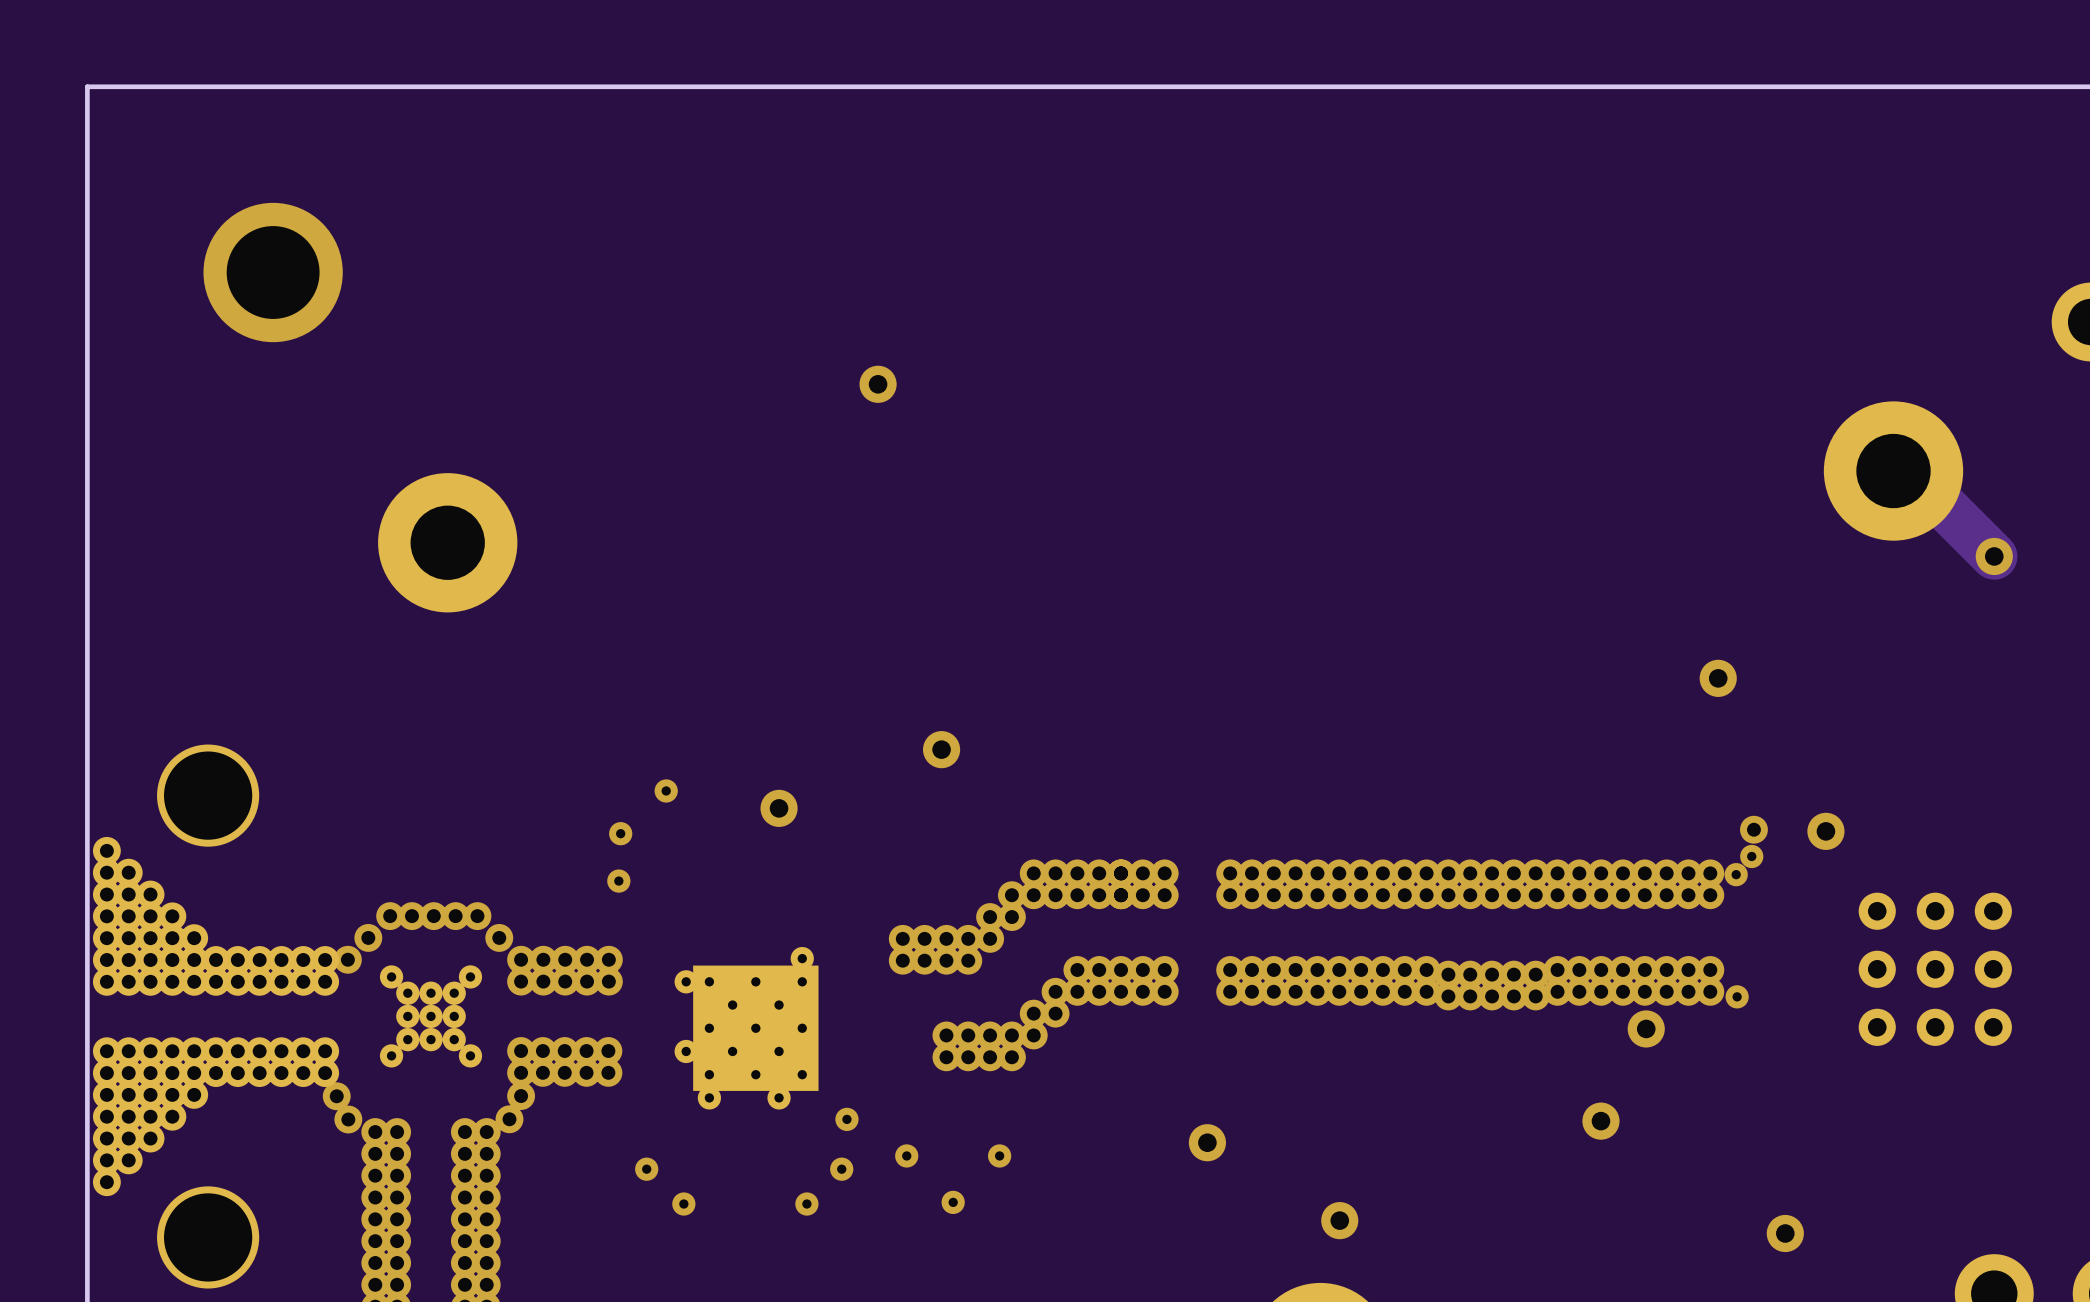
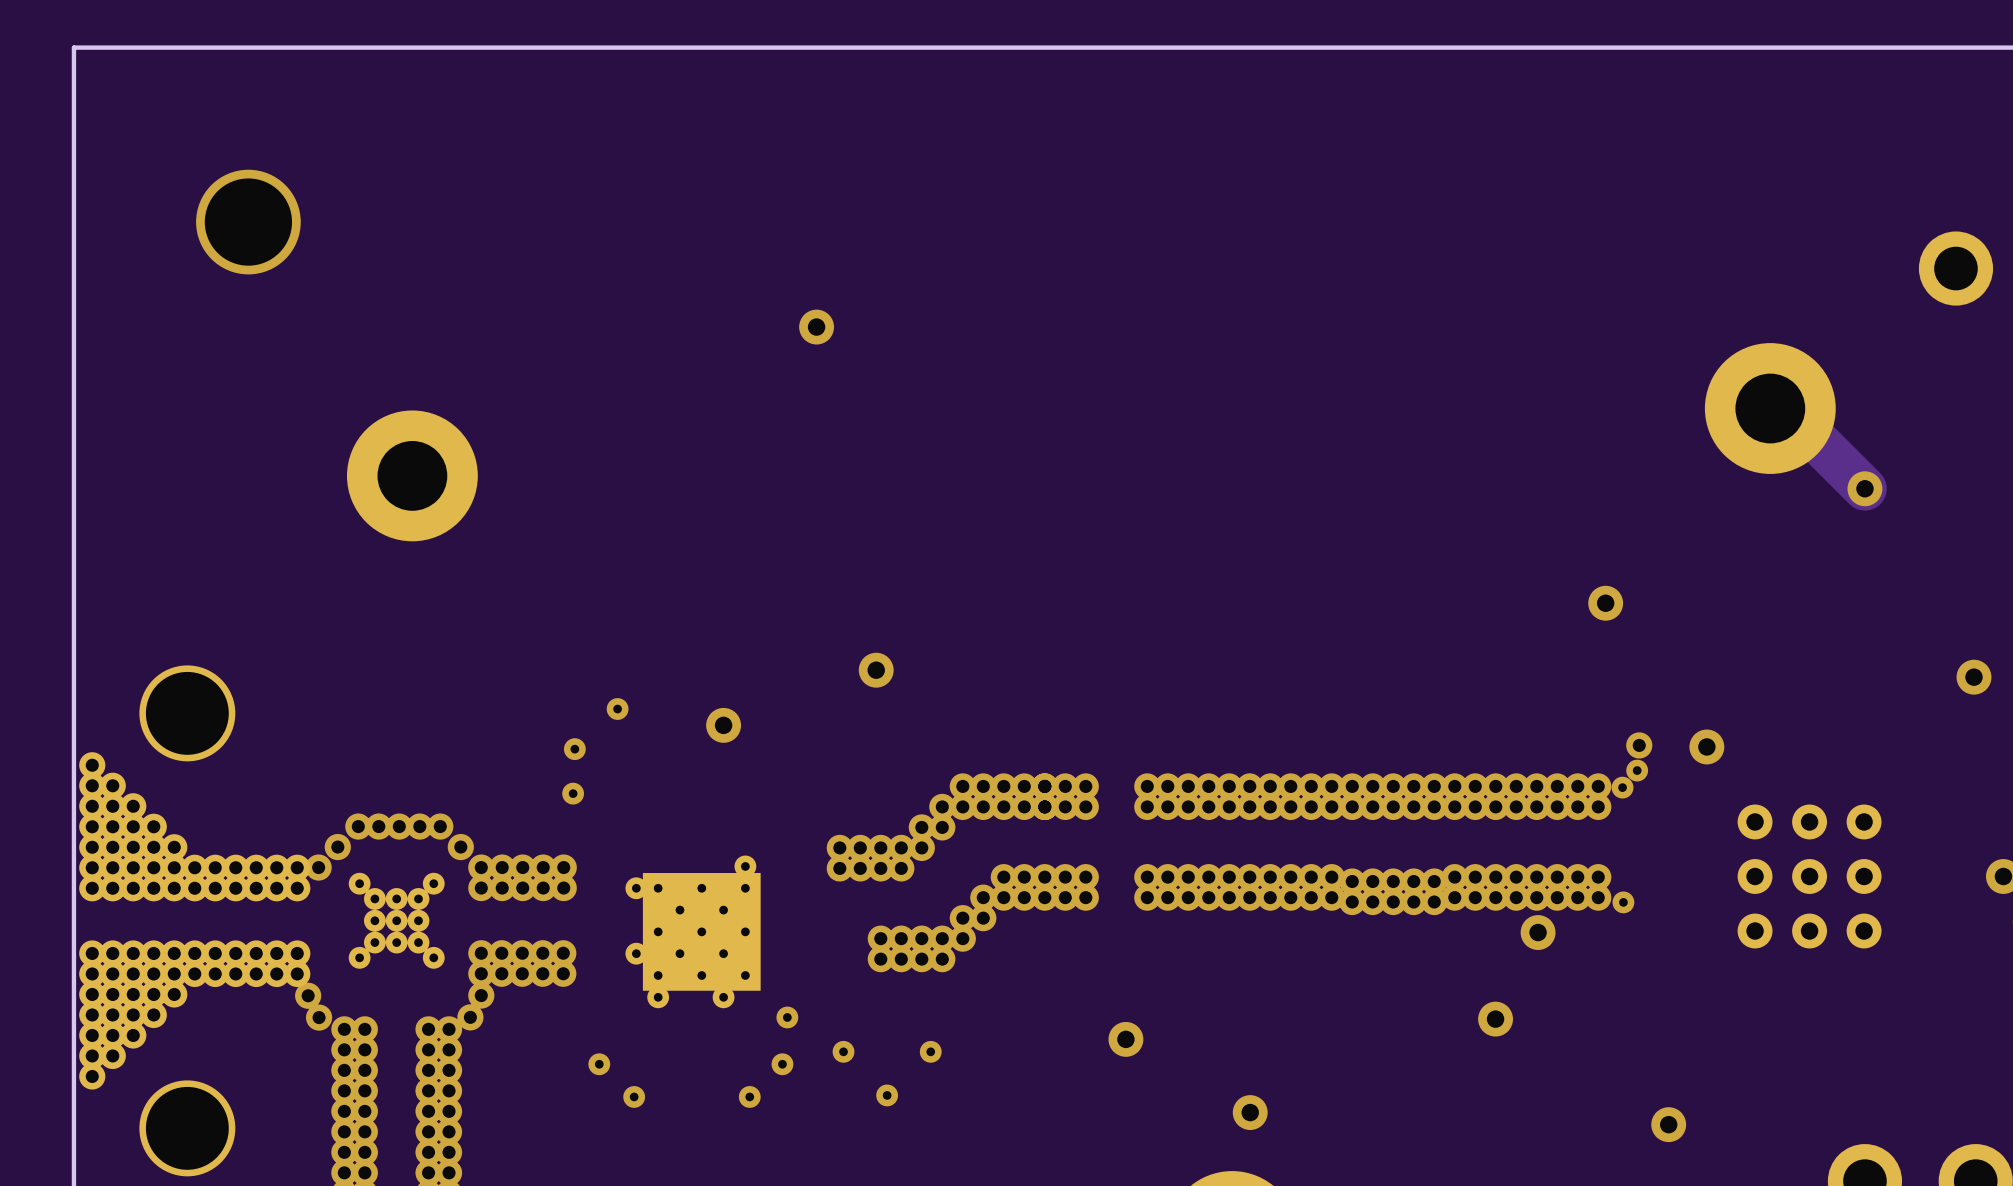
via size: [203, 202, 343, 343] -> [196, 169, 301, 275]

